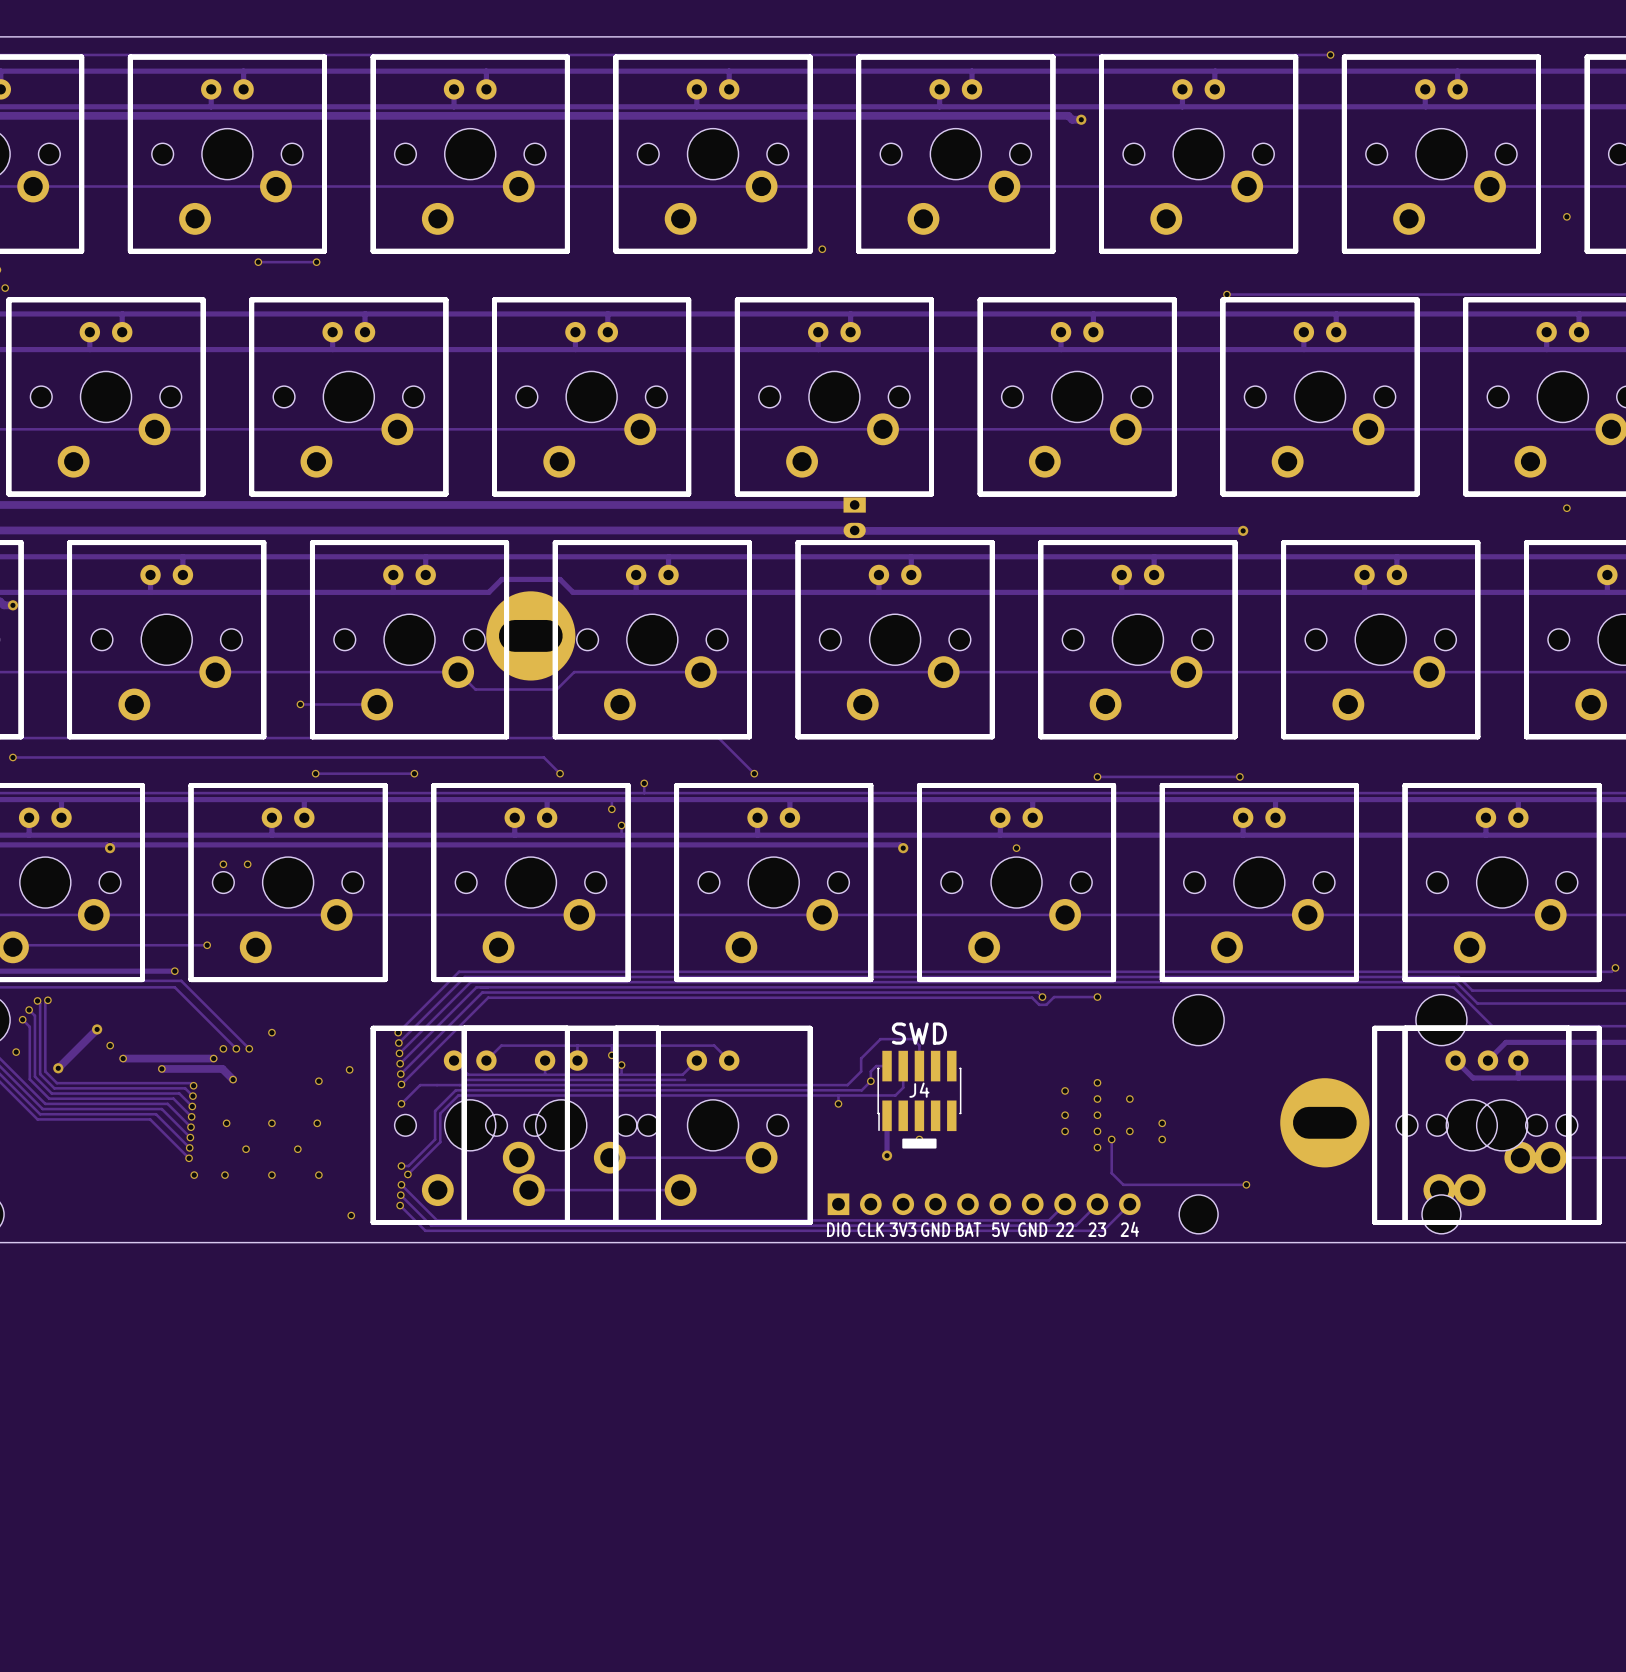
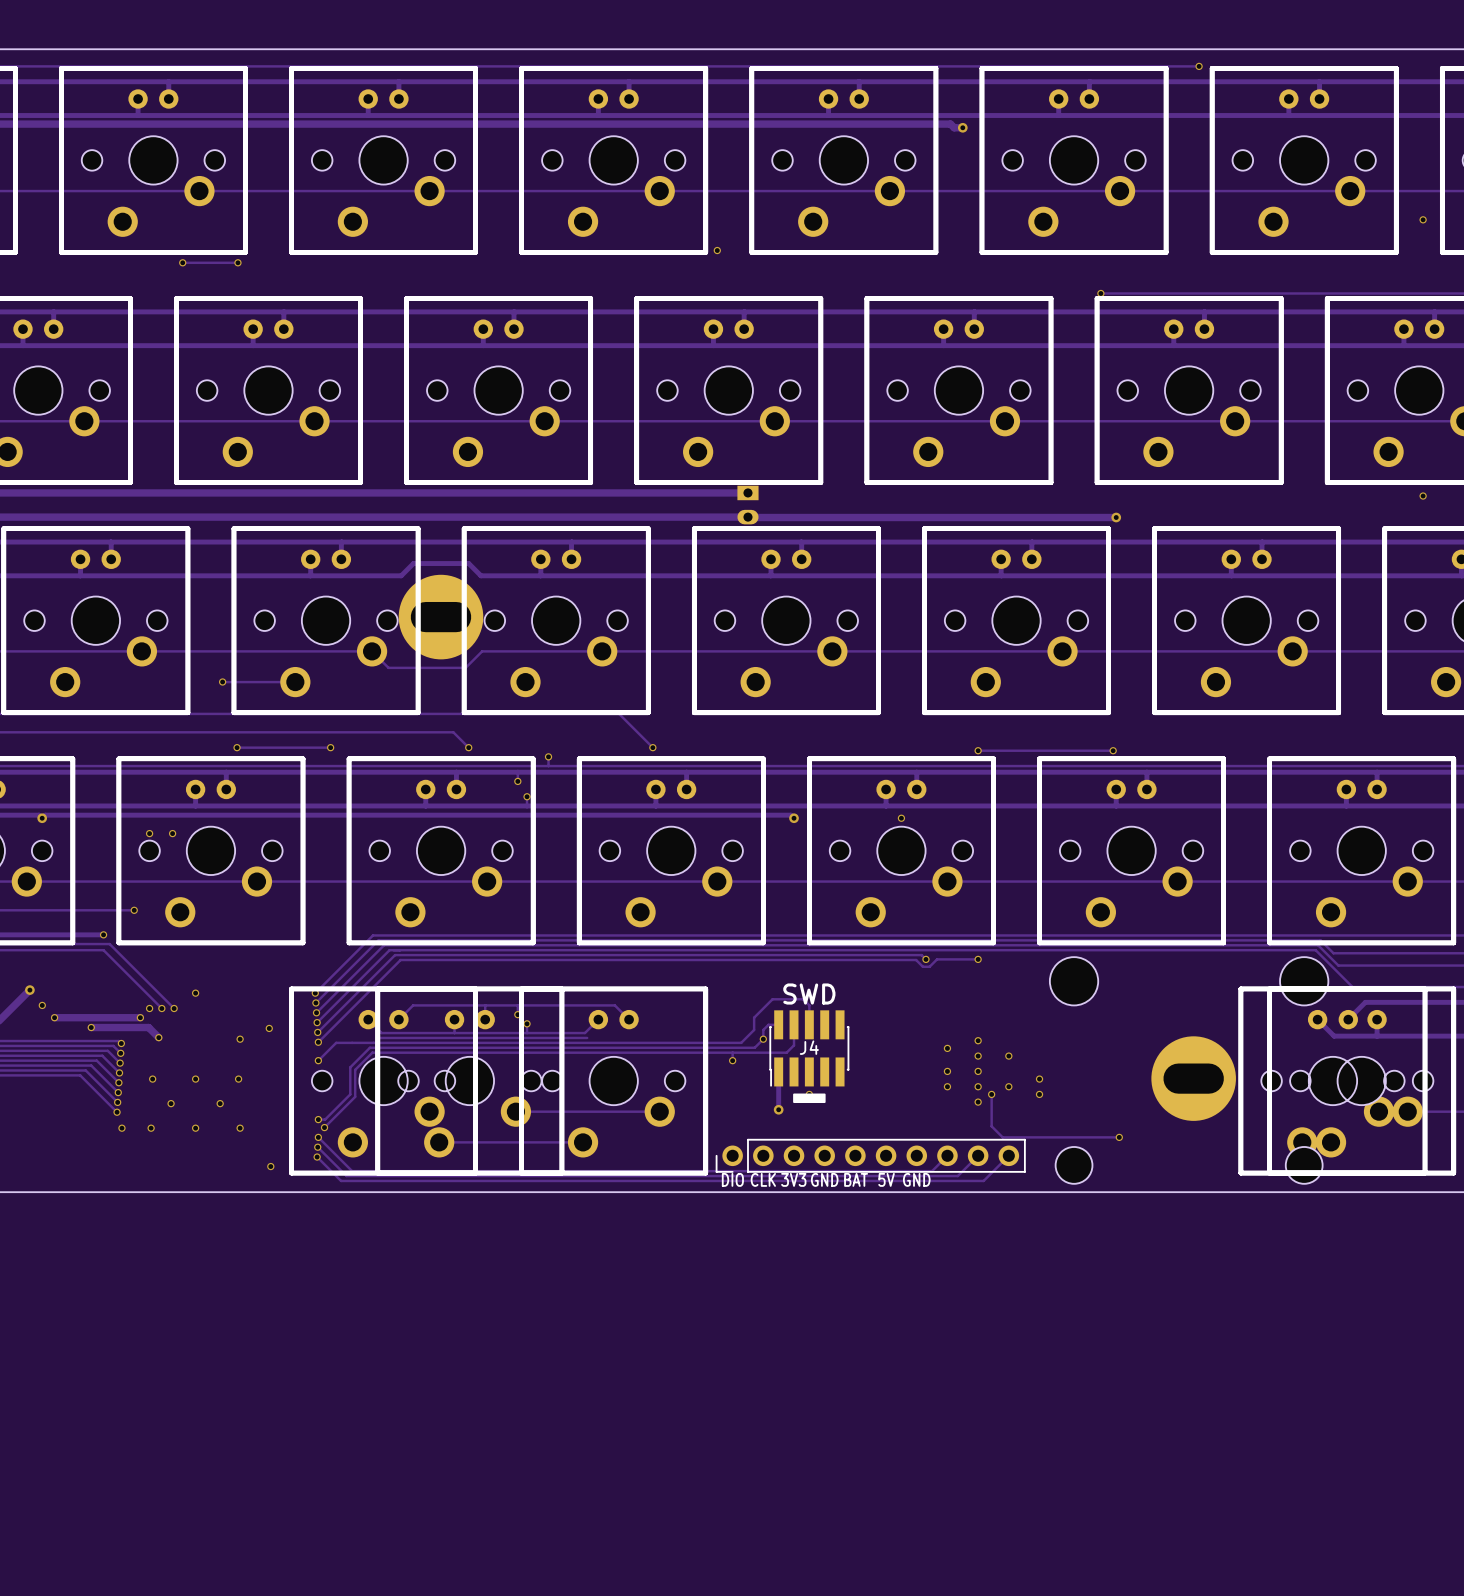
part footprint: [827, 1193, 1141, 1216] -> [715, 1139, 1026, 1173]
text: 22 (1064, 1229) -> none
text: 23 (1097, 1229) -> none
text: 24 (1129, 1229) -> none

